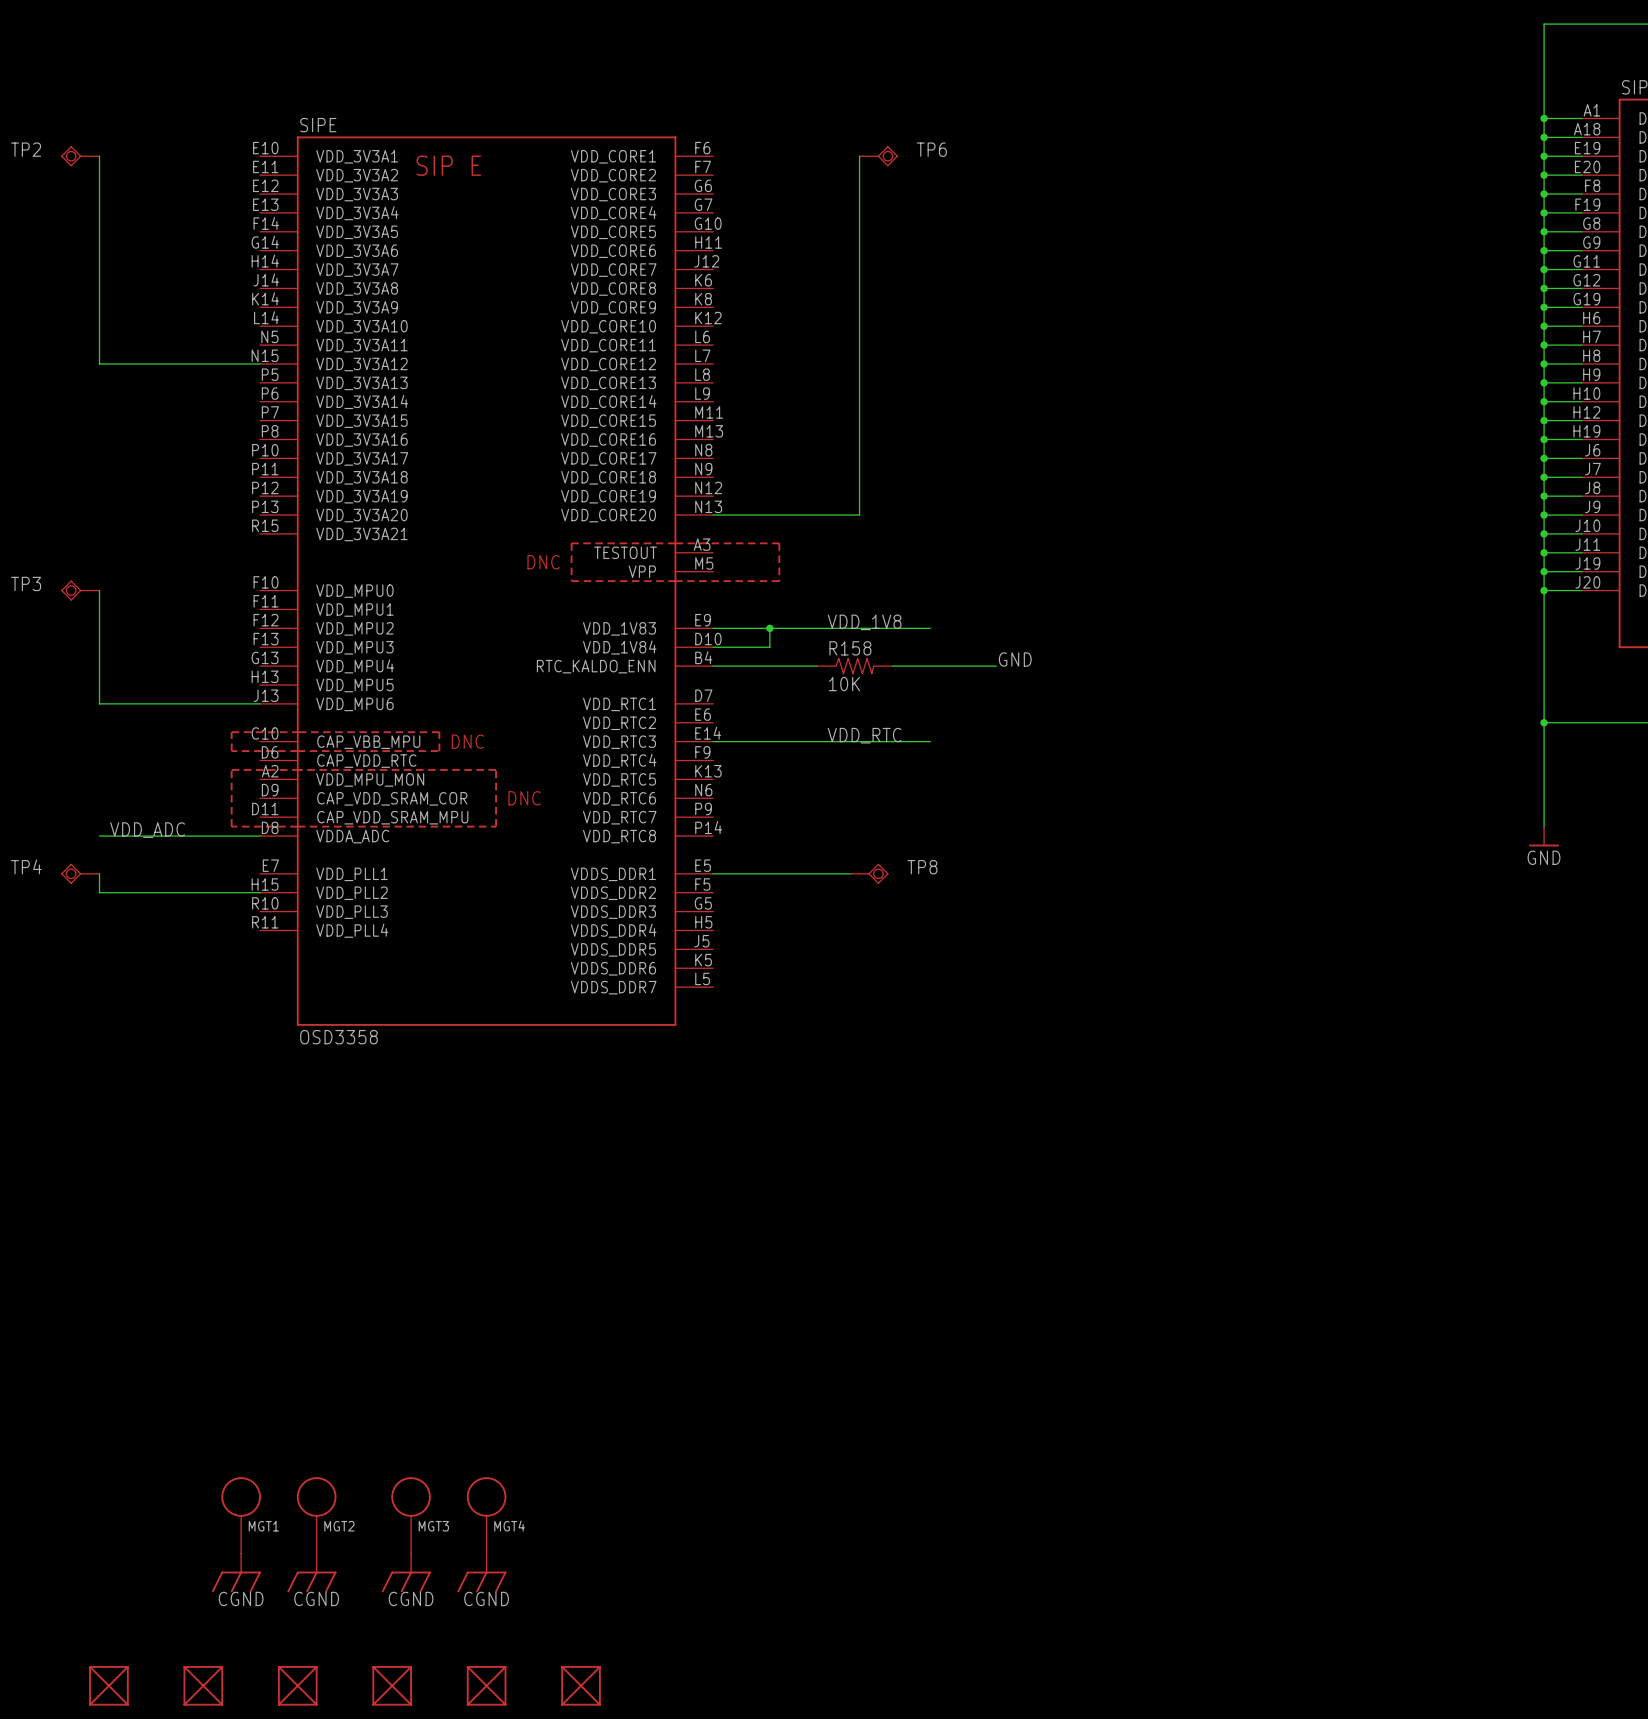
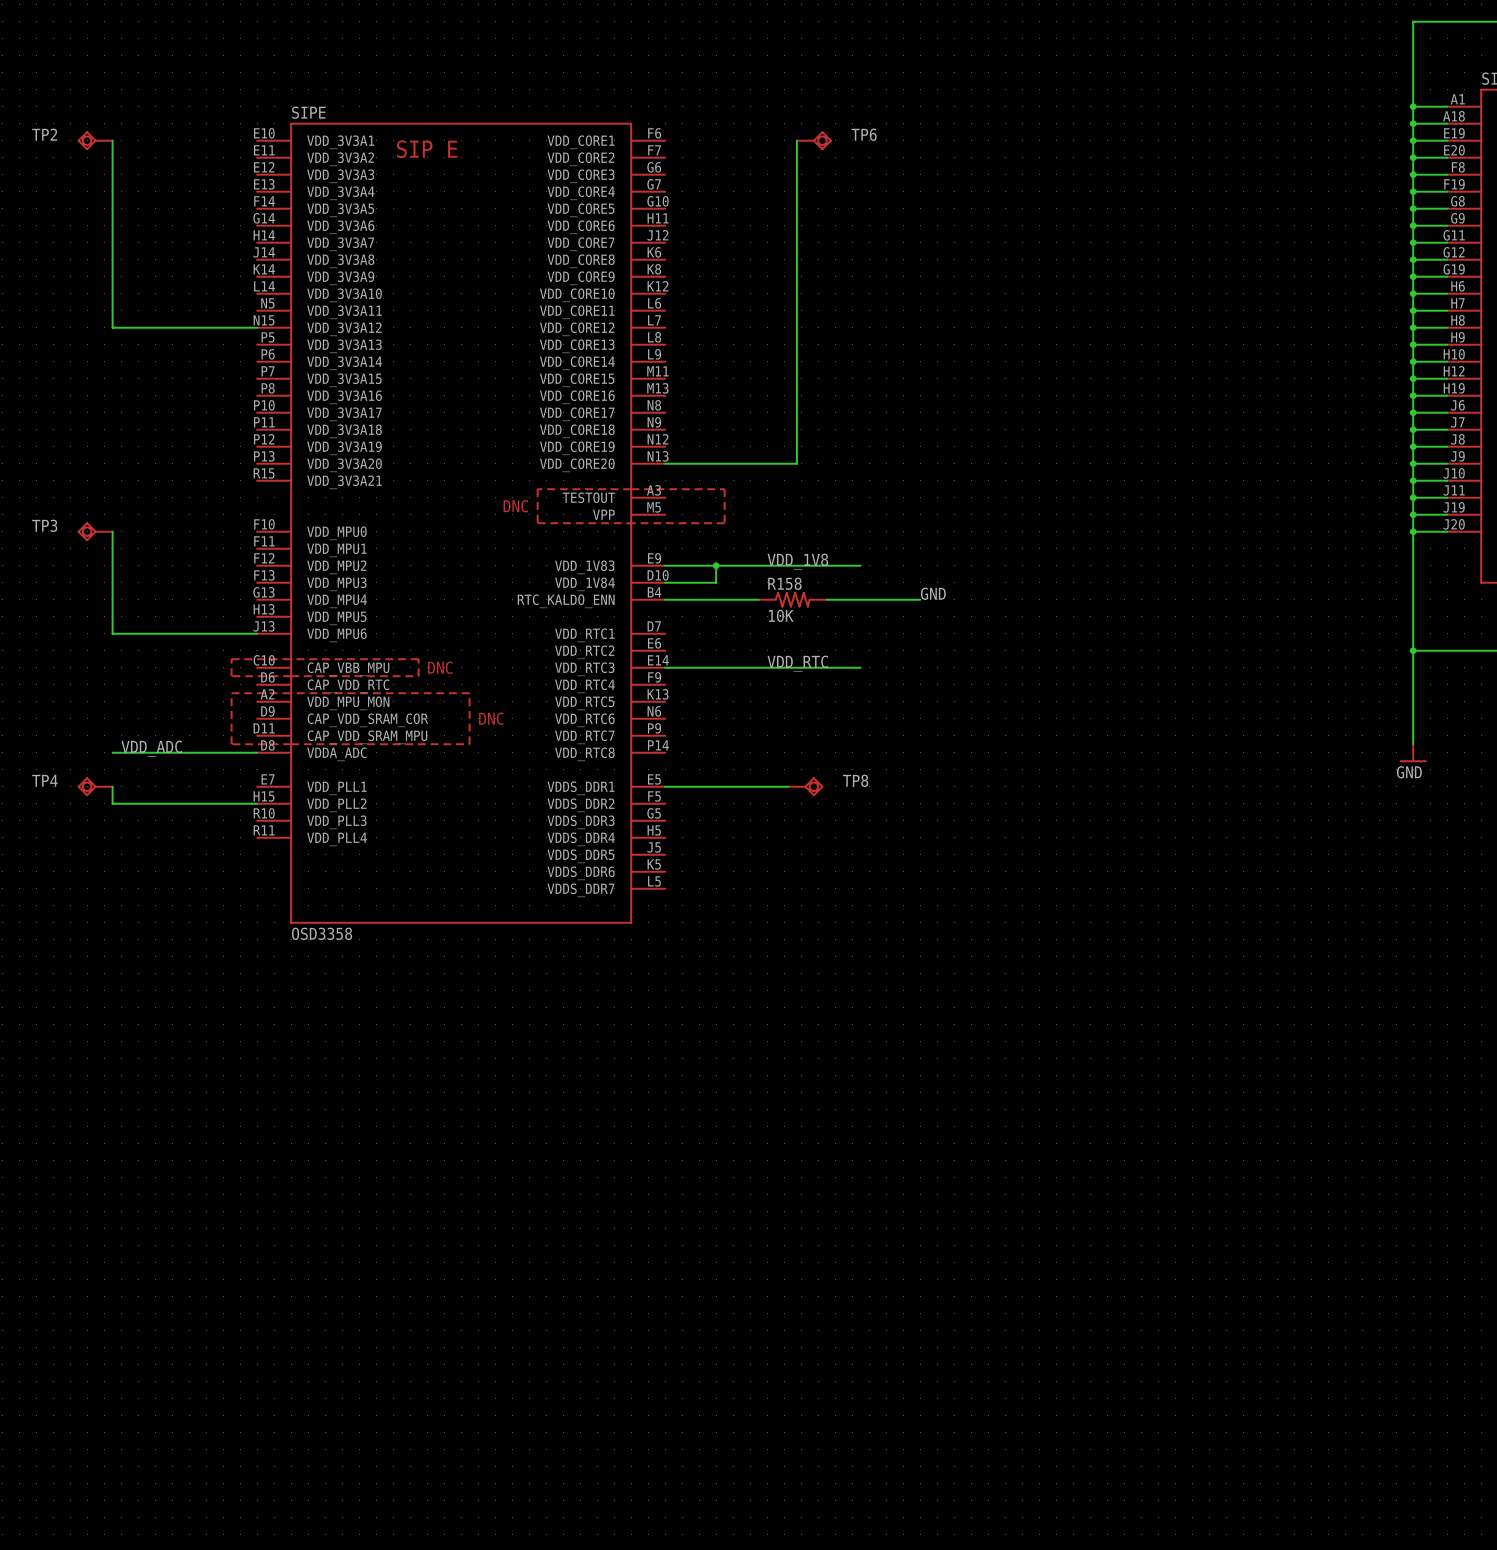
MGT1: (241, 1515) -> none
MGT2: (316, 1515) -> none
MGT3: (411, 1515) -> none
MGT4: (486, 1515) -> none
power symbol: CGND (236, 1572) -> none
power symbol: CGND (311, 1572) -> none
power symbol: CGND (406, 1572) -> none
power symbol: CGND (481, 1572) -> none
part: (108, 1685) -> none
part: (203, 1685) -> none
part: (297, 1685) -> none
part: (392, 1685) -> none
part: (486, 1685) -> none
part: (581, 1685) -> none

